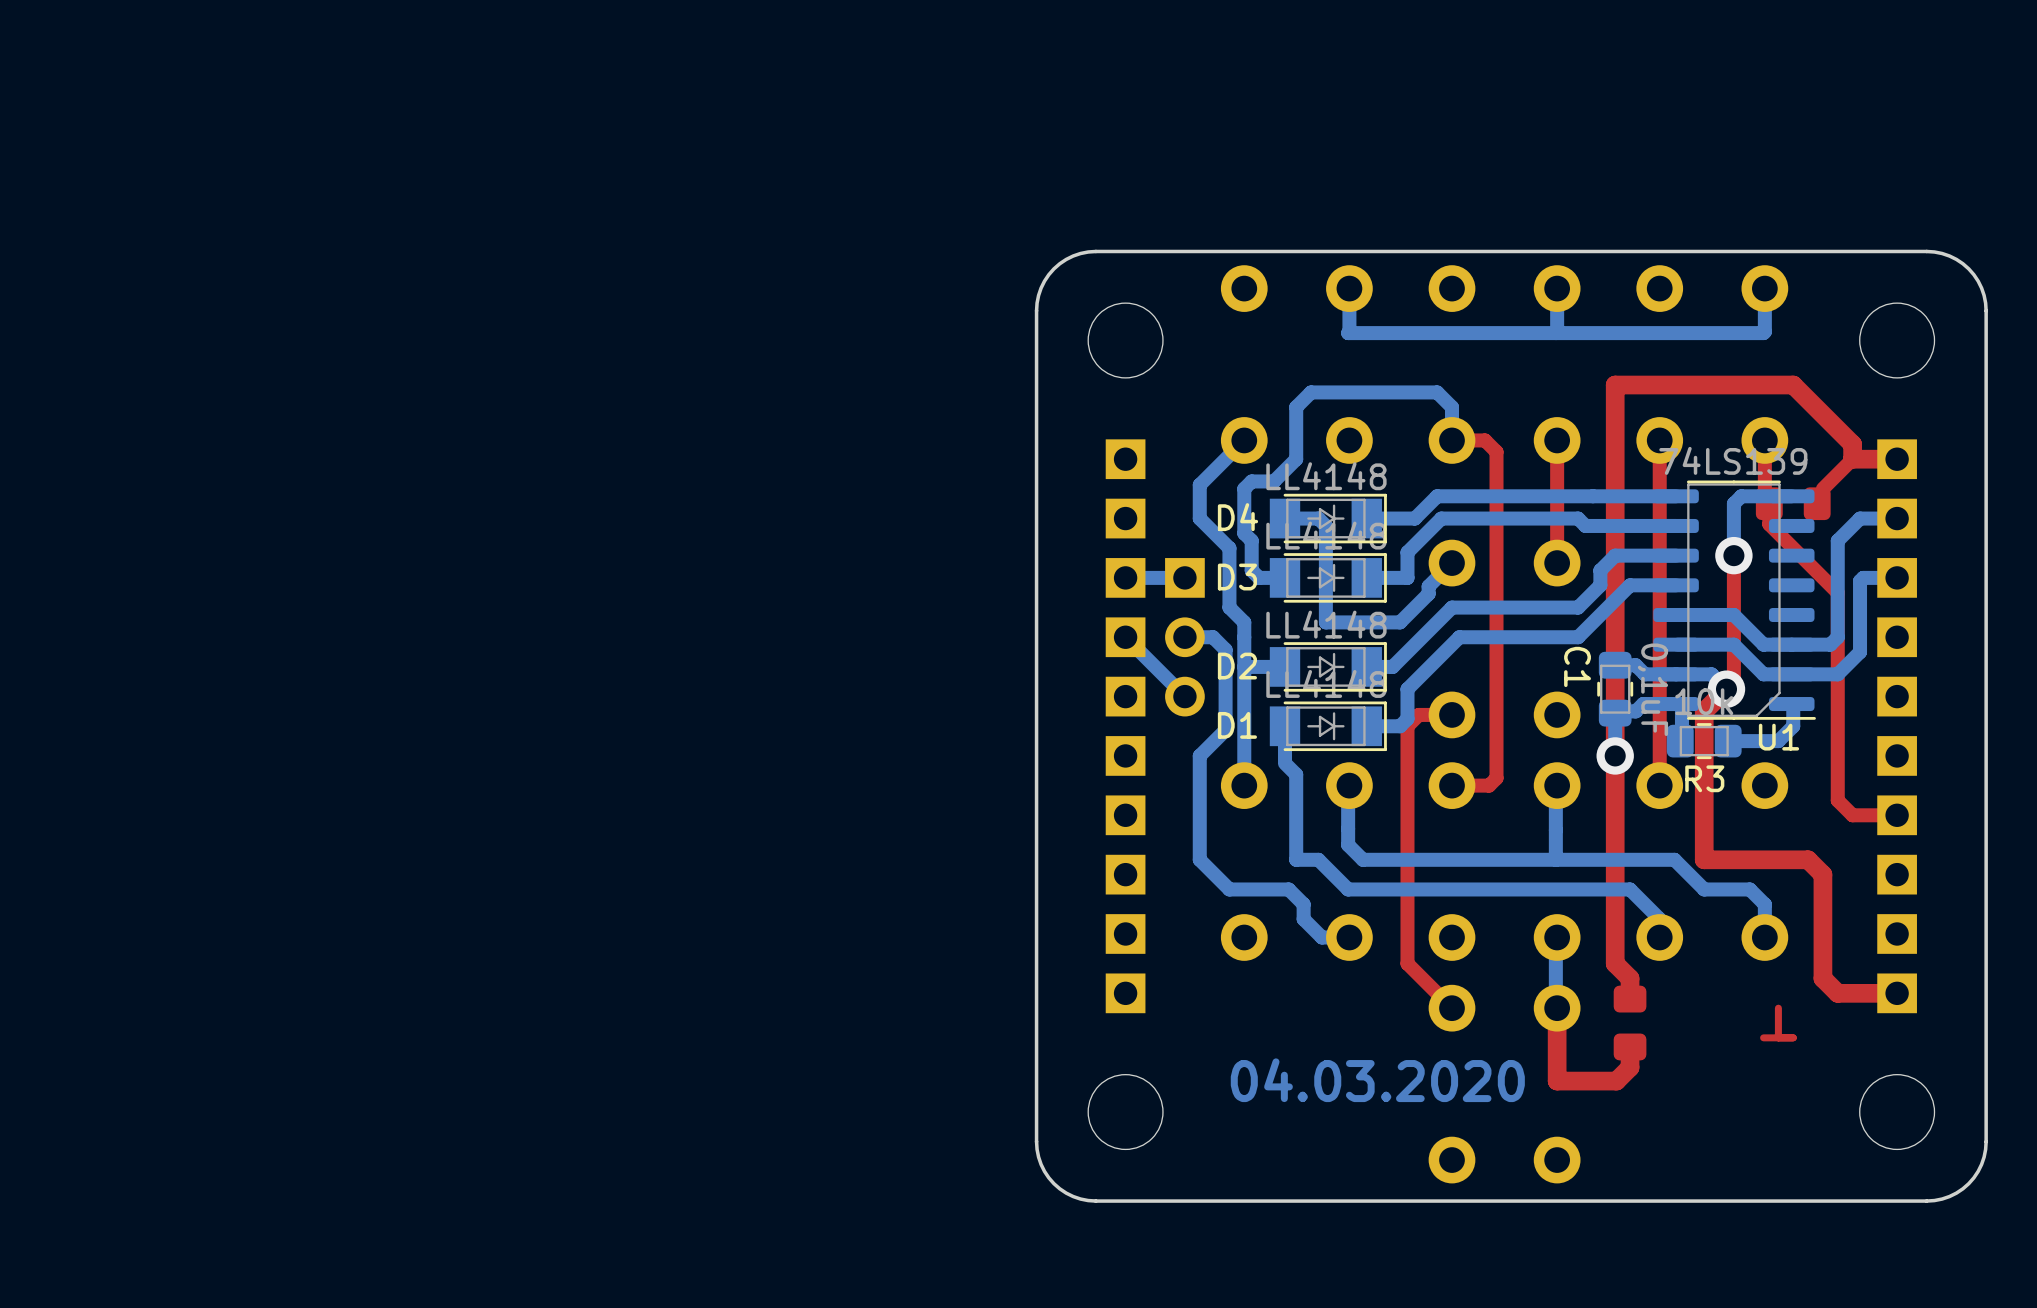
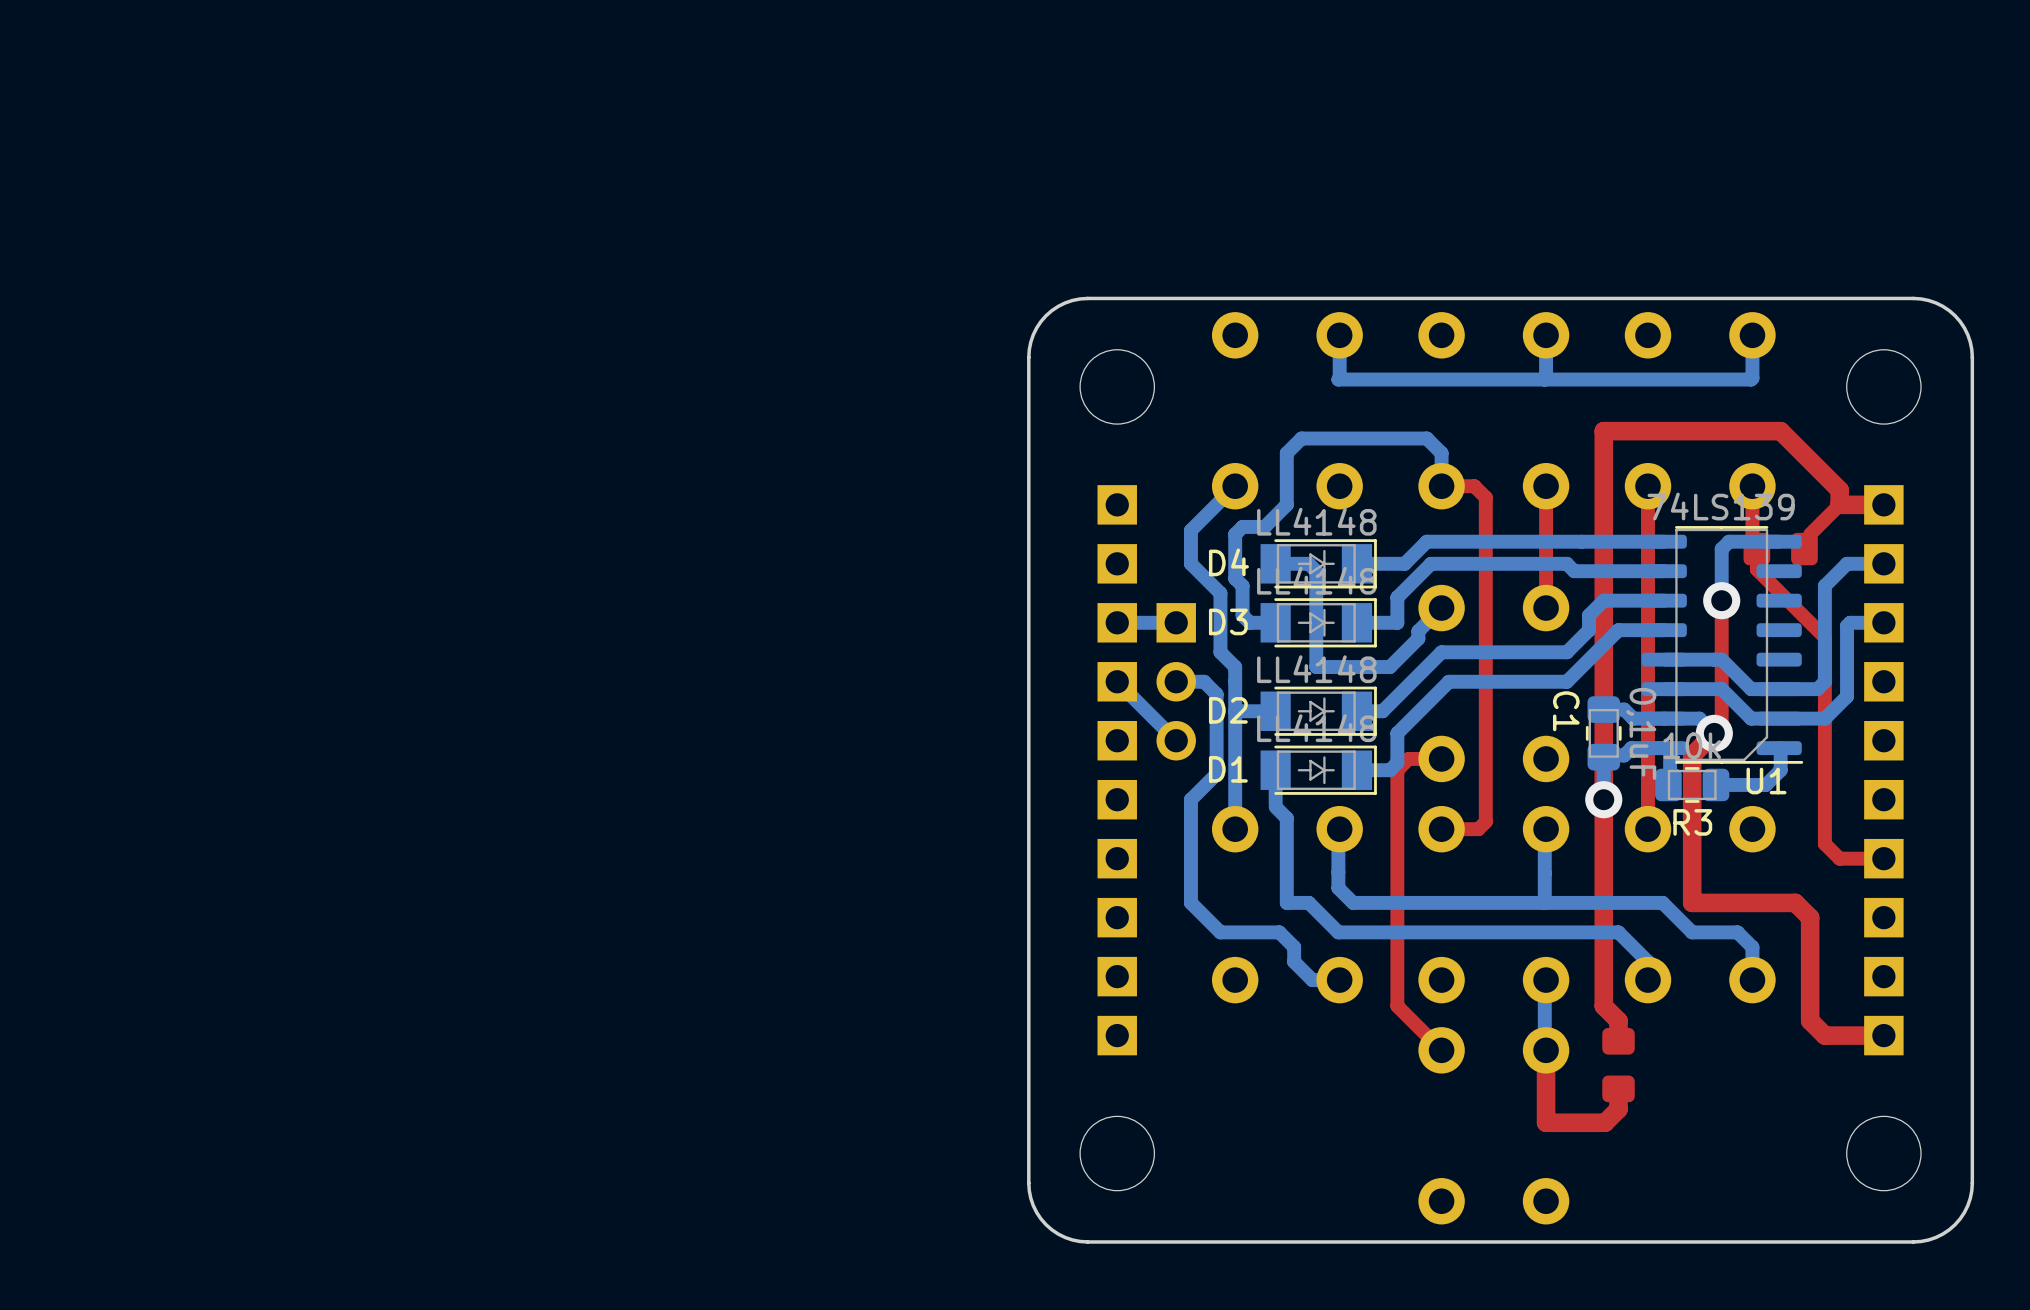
top track: (1778, 1008) (1778, 1037) -> none
top track: (1793, 1037) (1763, 1037) -> none
text: 04.03.2020 (1377, 1080) -> none

